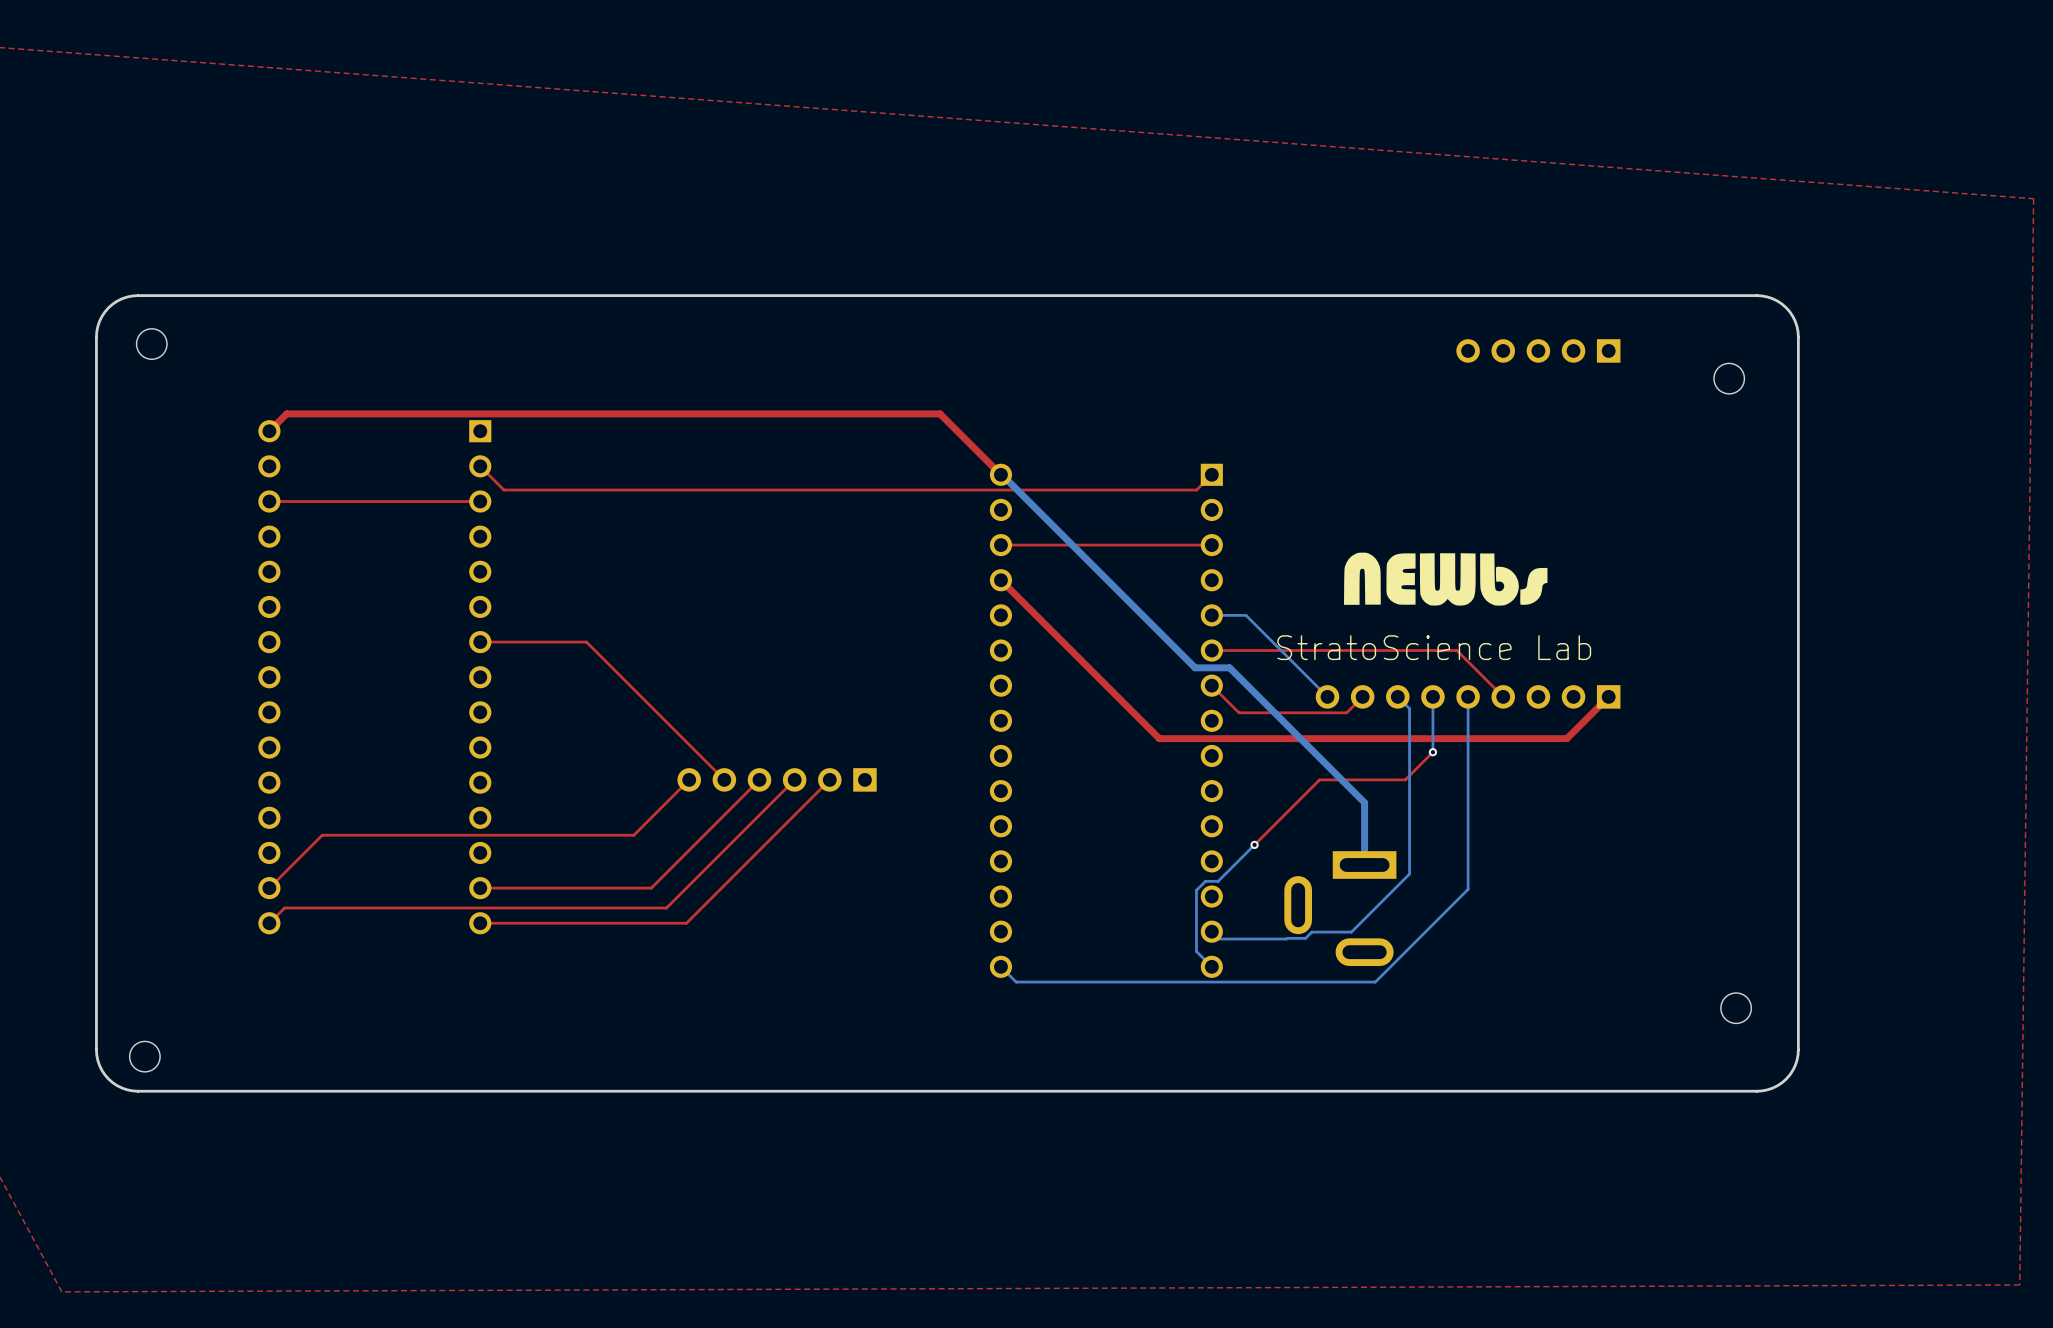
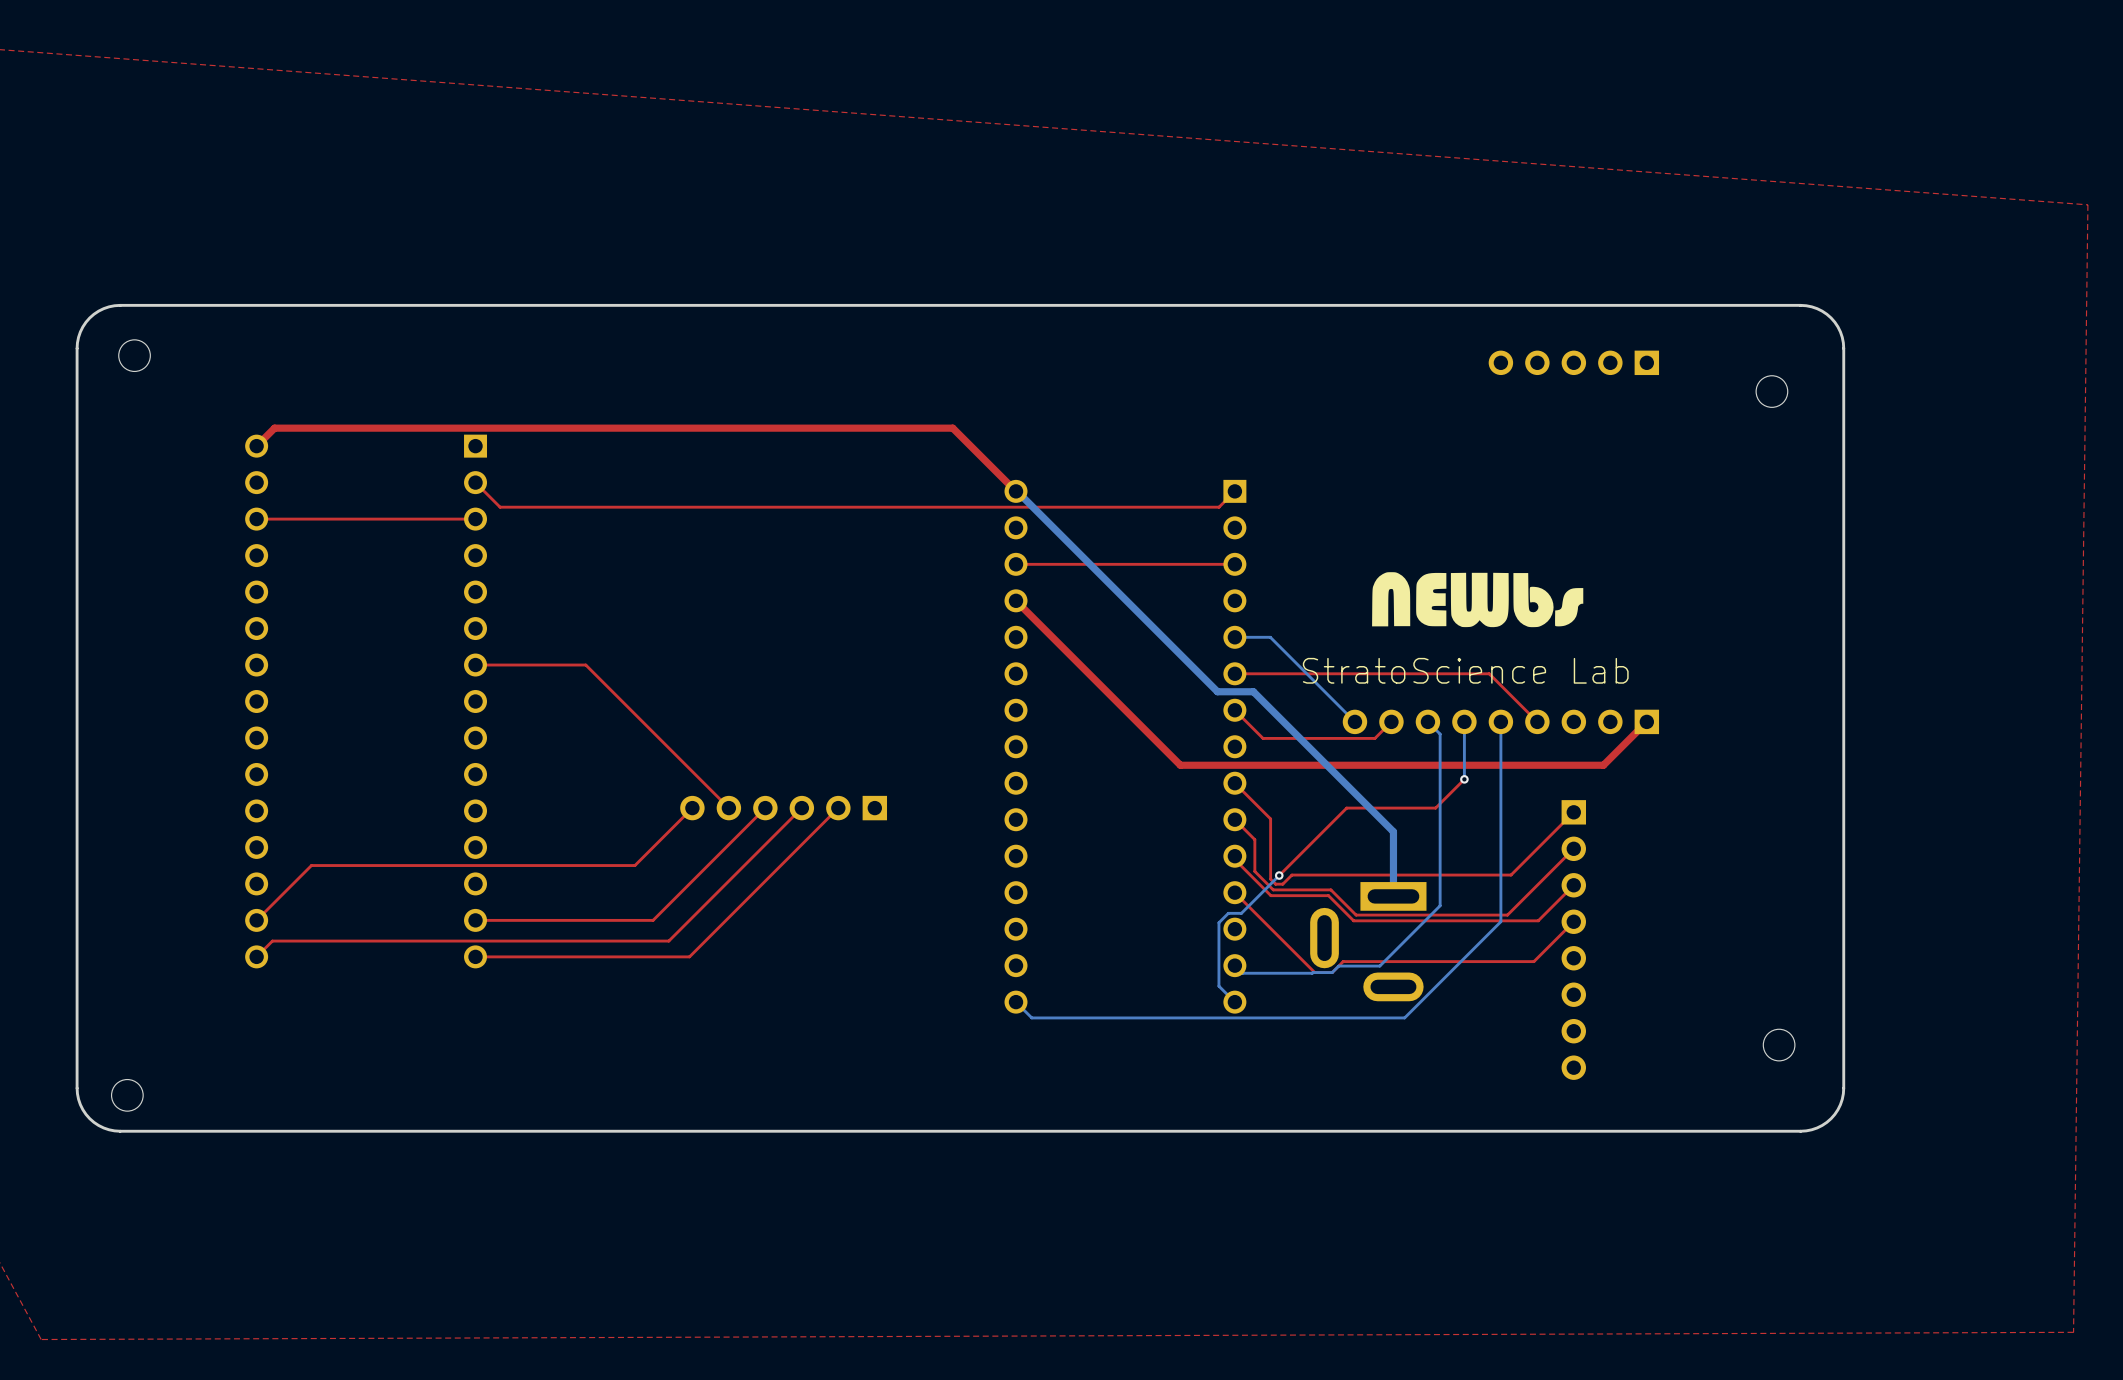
top track: none -> (1234, 783) (1270, 818) (1270, 879) (1275, 884) (1282, 884) (1291, 875) (1511, 875) (1573, 812)
top track: none -> (1234, 819) (1254, 839) (1254, 871) (1273, 889) (1330, 889) (1356, 915) (1507, 915) (1573, 848)
top track: none -> (1234, 856) (1234, 859) (1270, 895) (1328, 895) (1353, 920) (1538, 920) (1573, 885)
top track: none -> (1234, 892) (1314, 972) (1332, 972) (1343, 961) (1533, 961) (1573, 921)
part: none -> (1573, 940)

